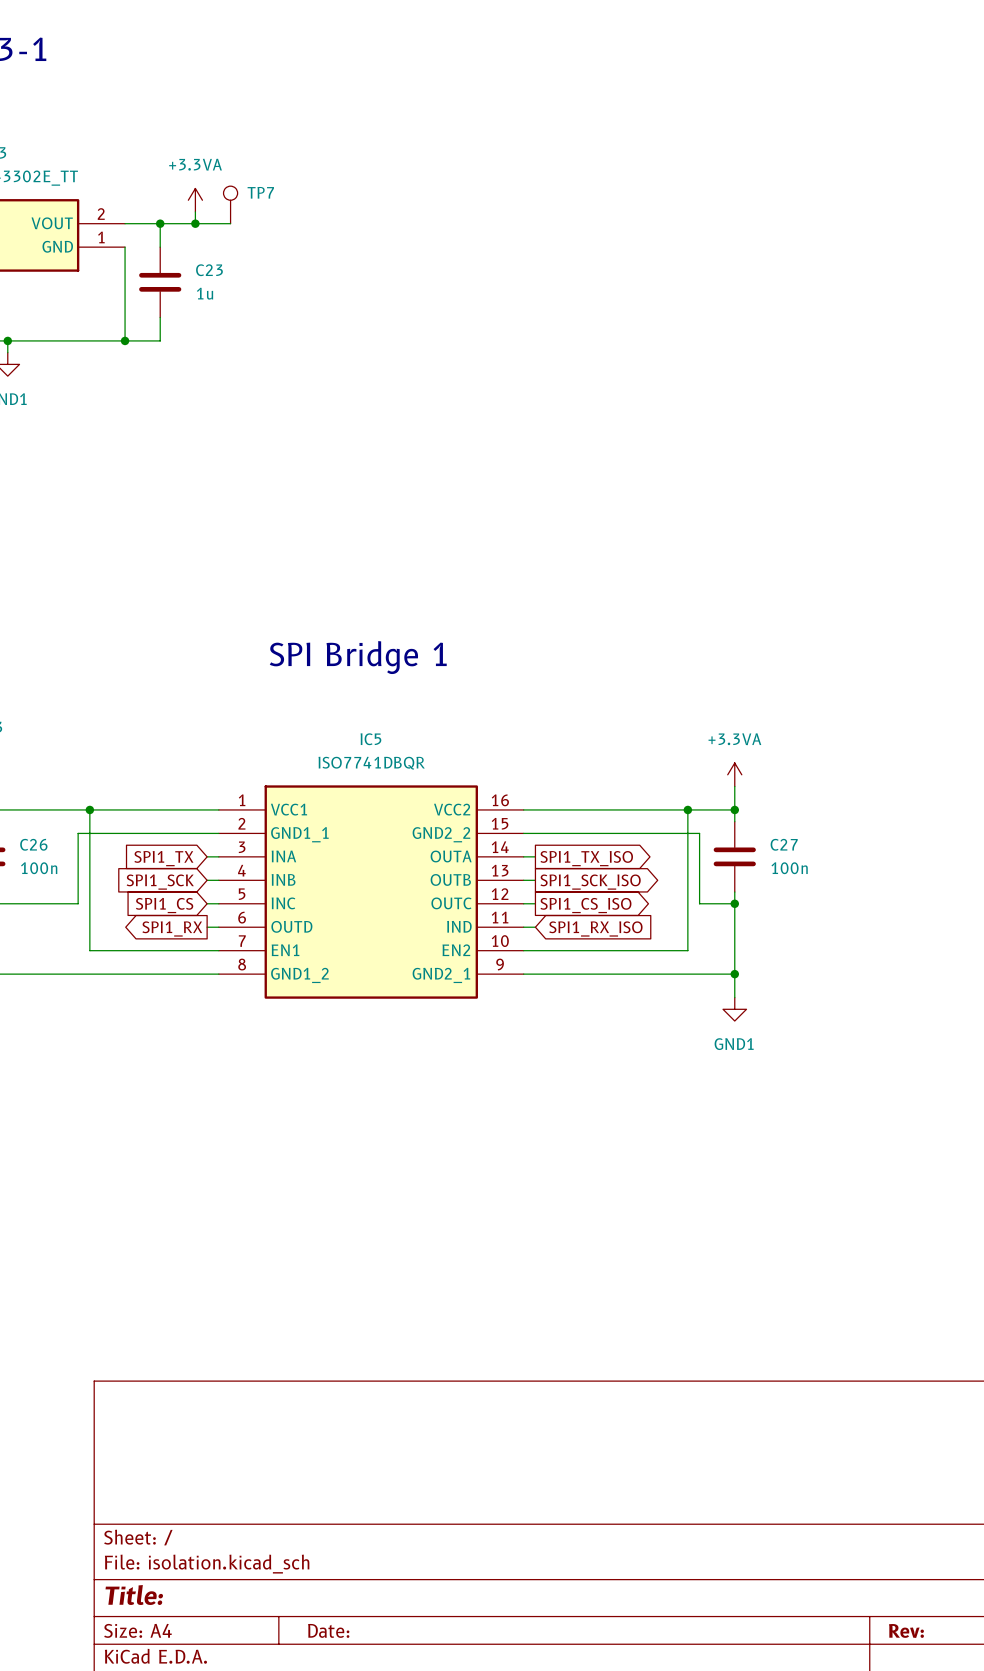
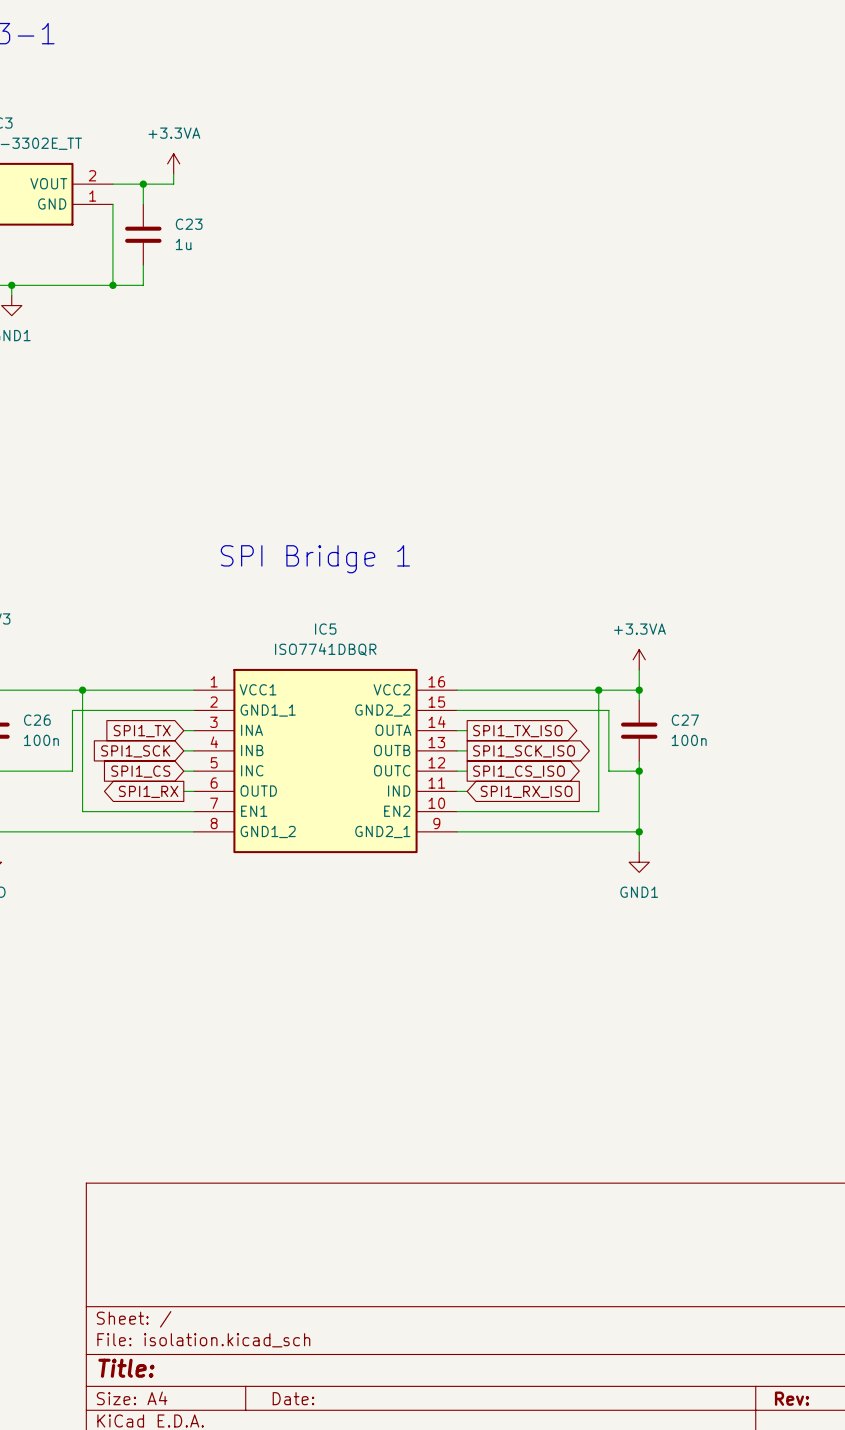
TP7: (230, 204) -> none
wire: (195, 223) (230, 223) -> none
junction: (195, 223) -> none

